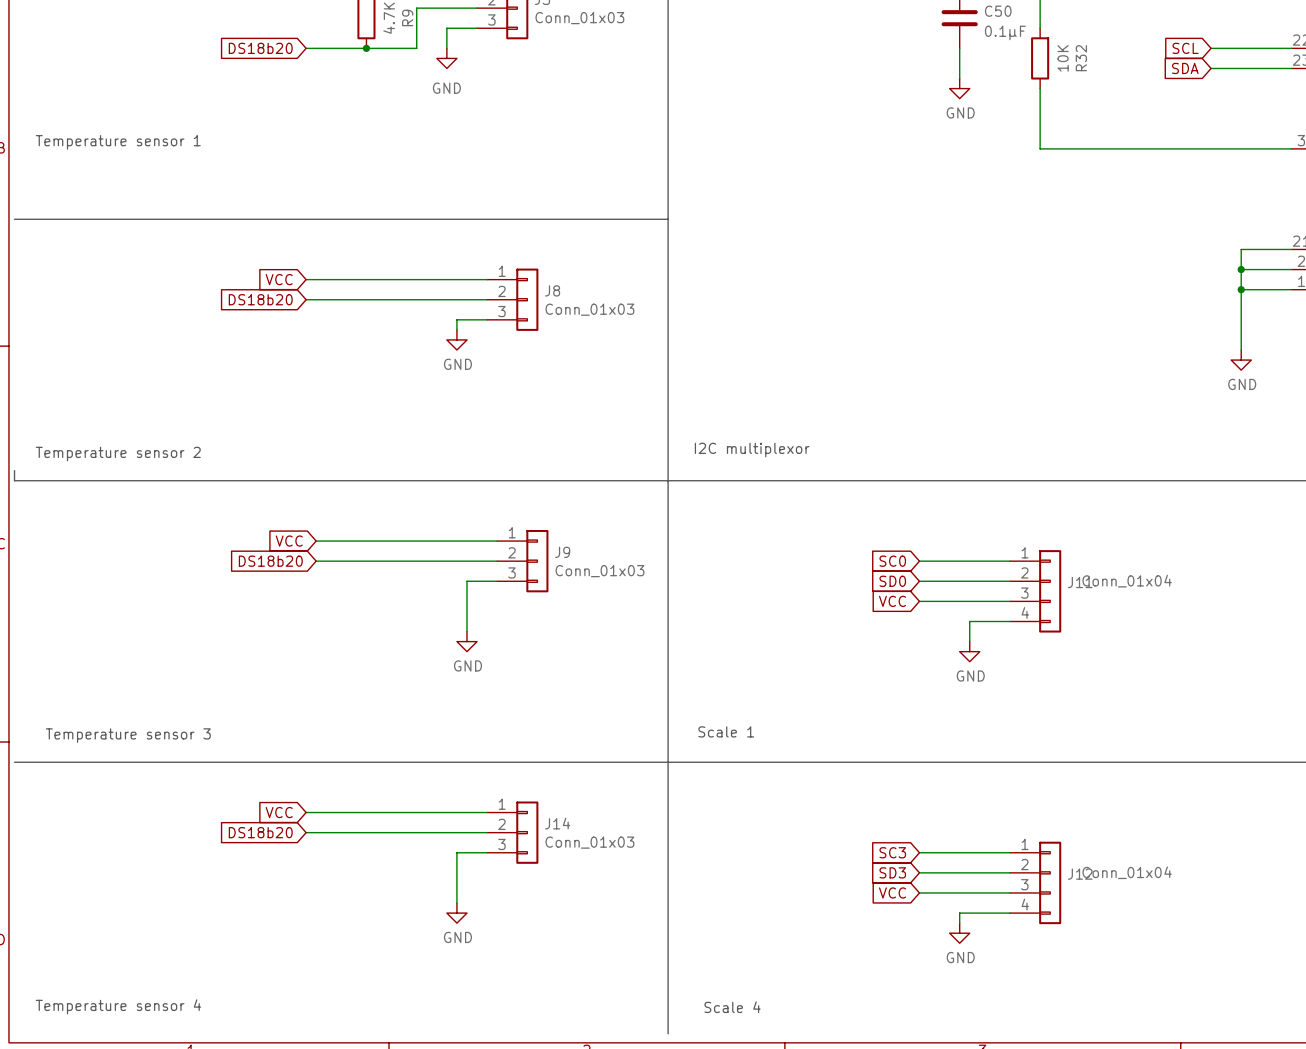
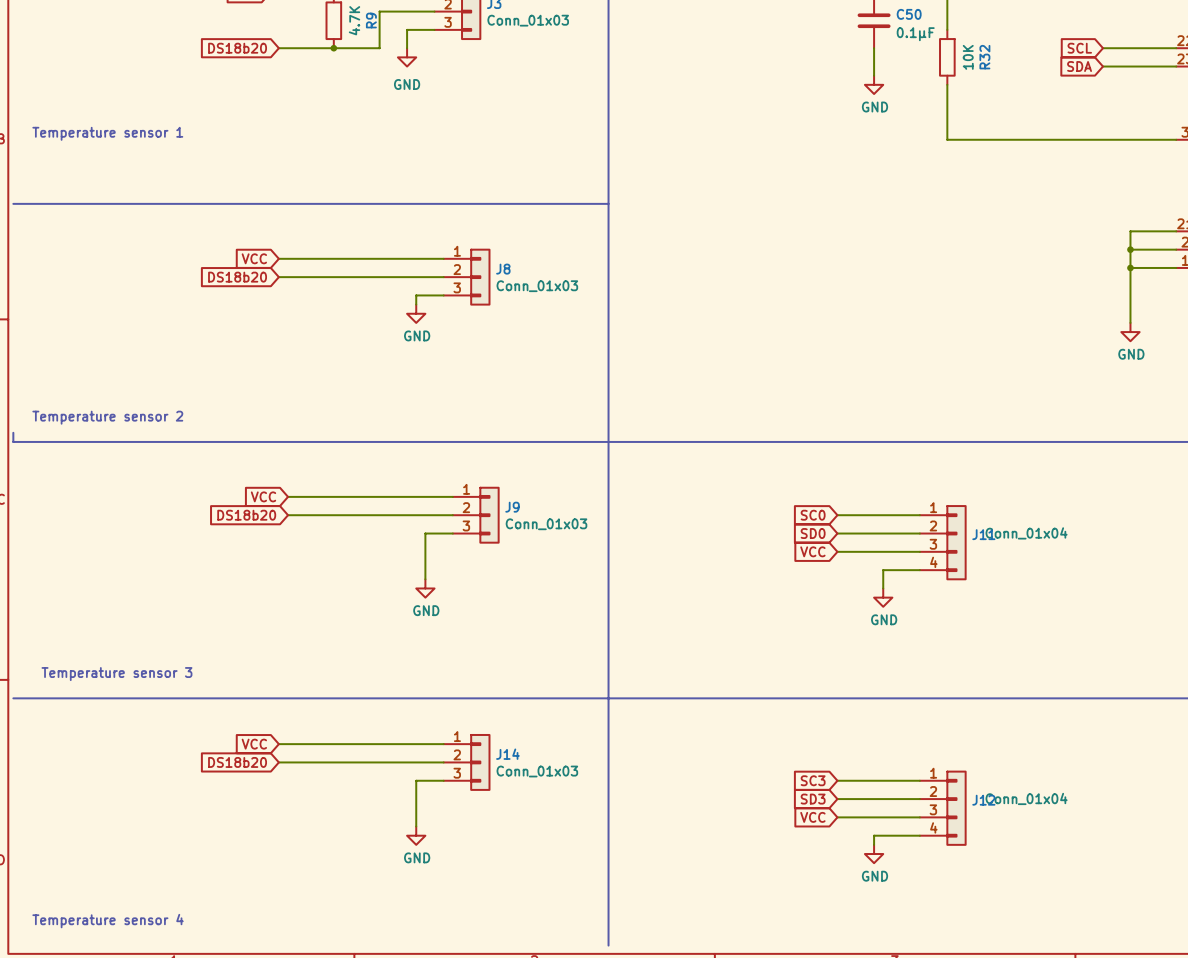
text: I2C multiplexor (752, 450) -> none
text: Scale 1 (726, 731) -> none
text: Scale 4 (732, 1007) -> none

